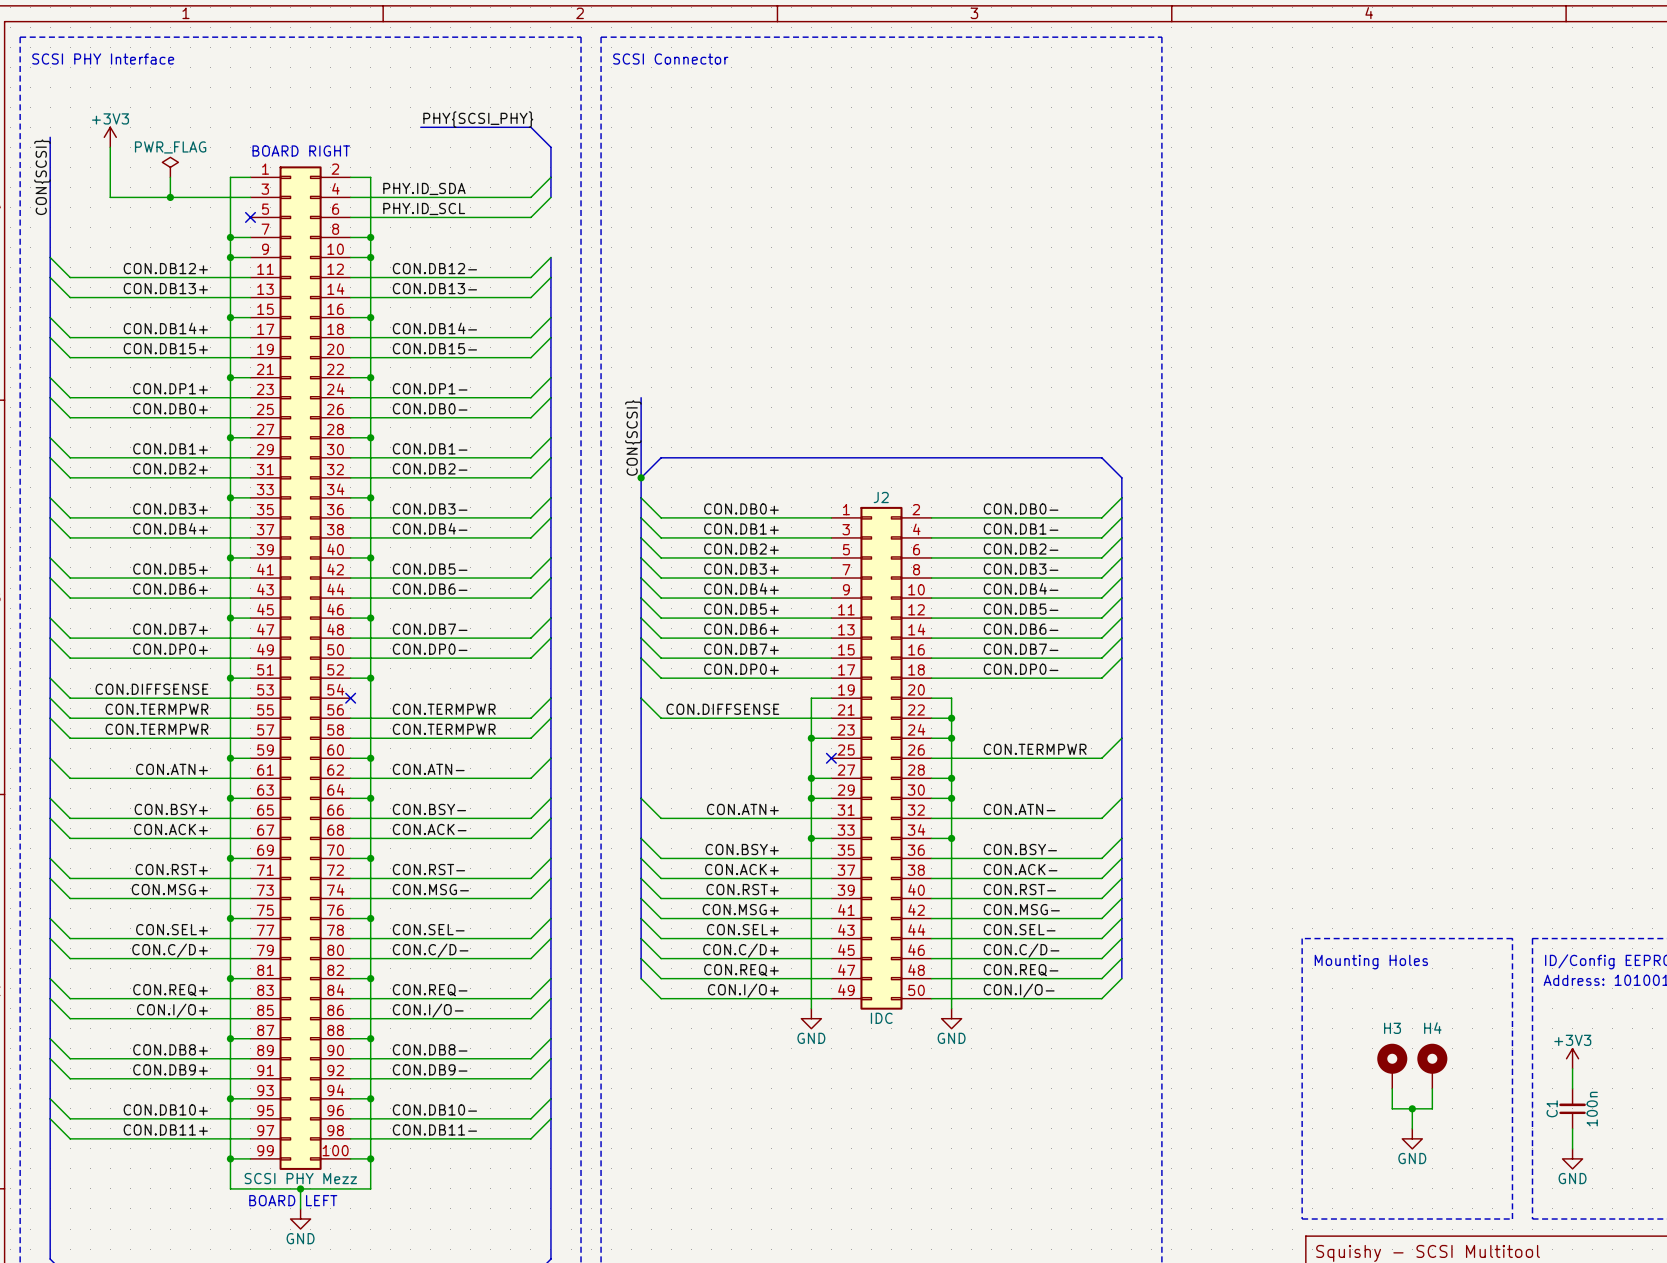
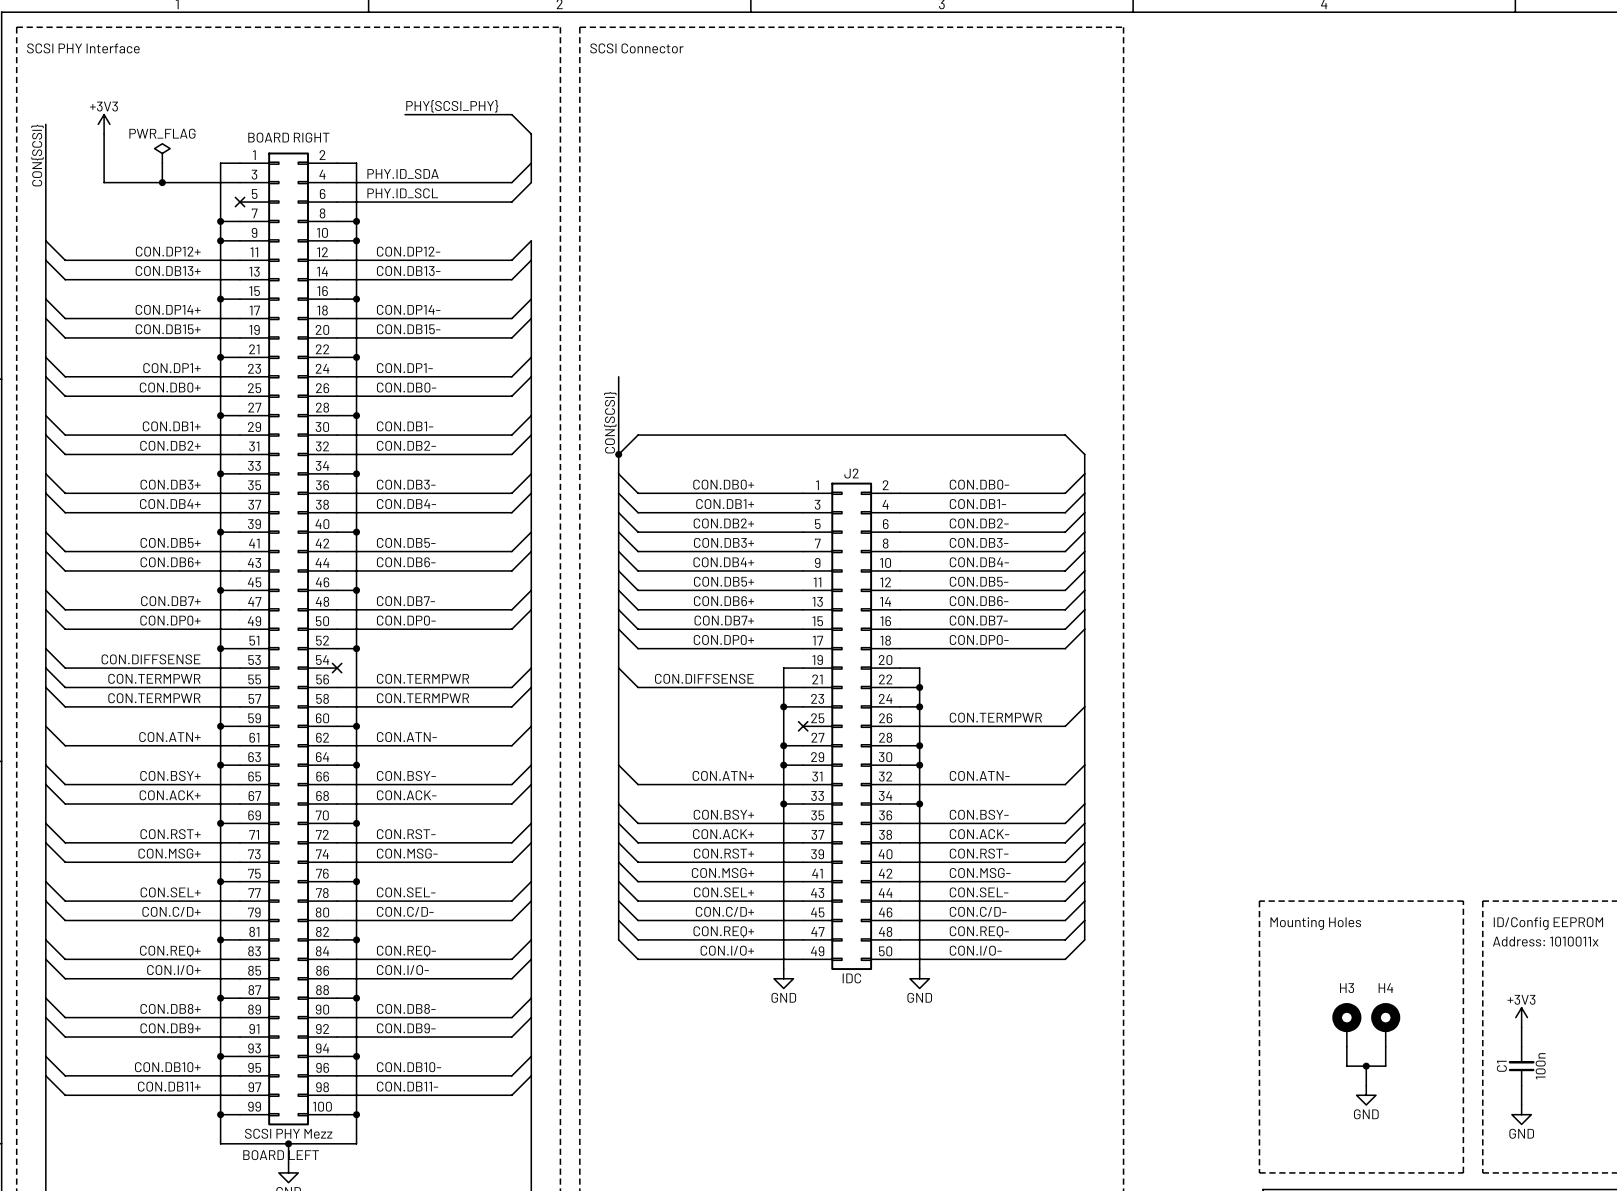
label: CON.DB12+ (165, 268) -> CON.DP12+ (168, 251)
label: CON.DB12- (434, 268) -> CON.DP12- (408, 251)
label: CON.DB14+ (165, 328) -> CON.DP14+ (168, 309)
label: CON.DB14- (434, 328) -> CON.DP14- (408, 309)

